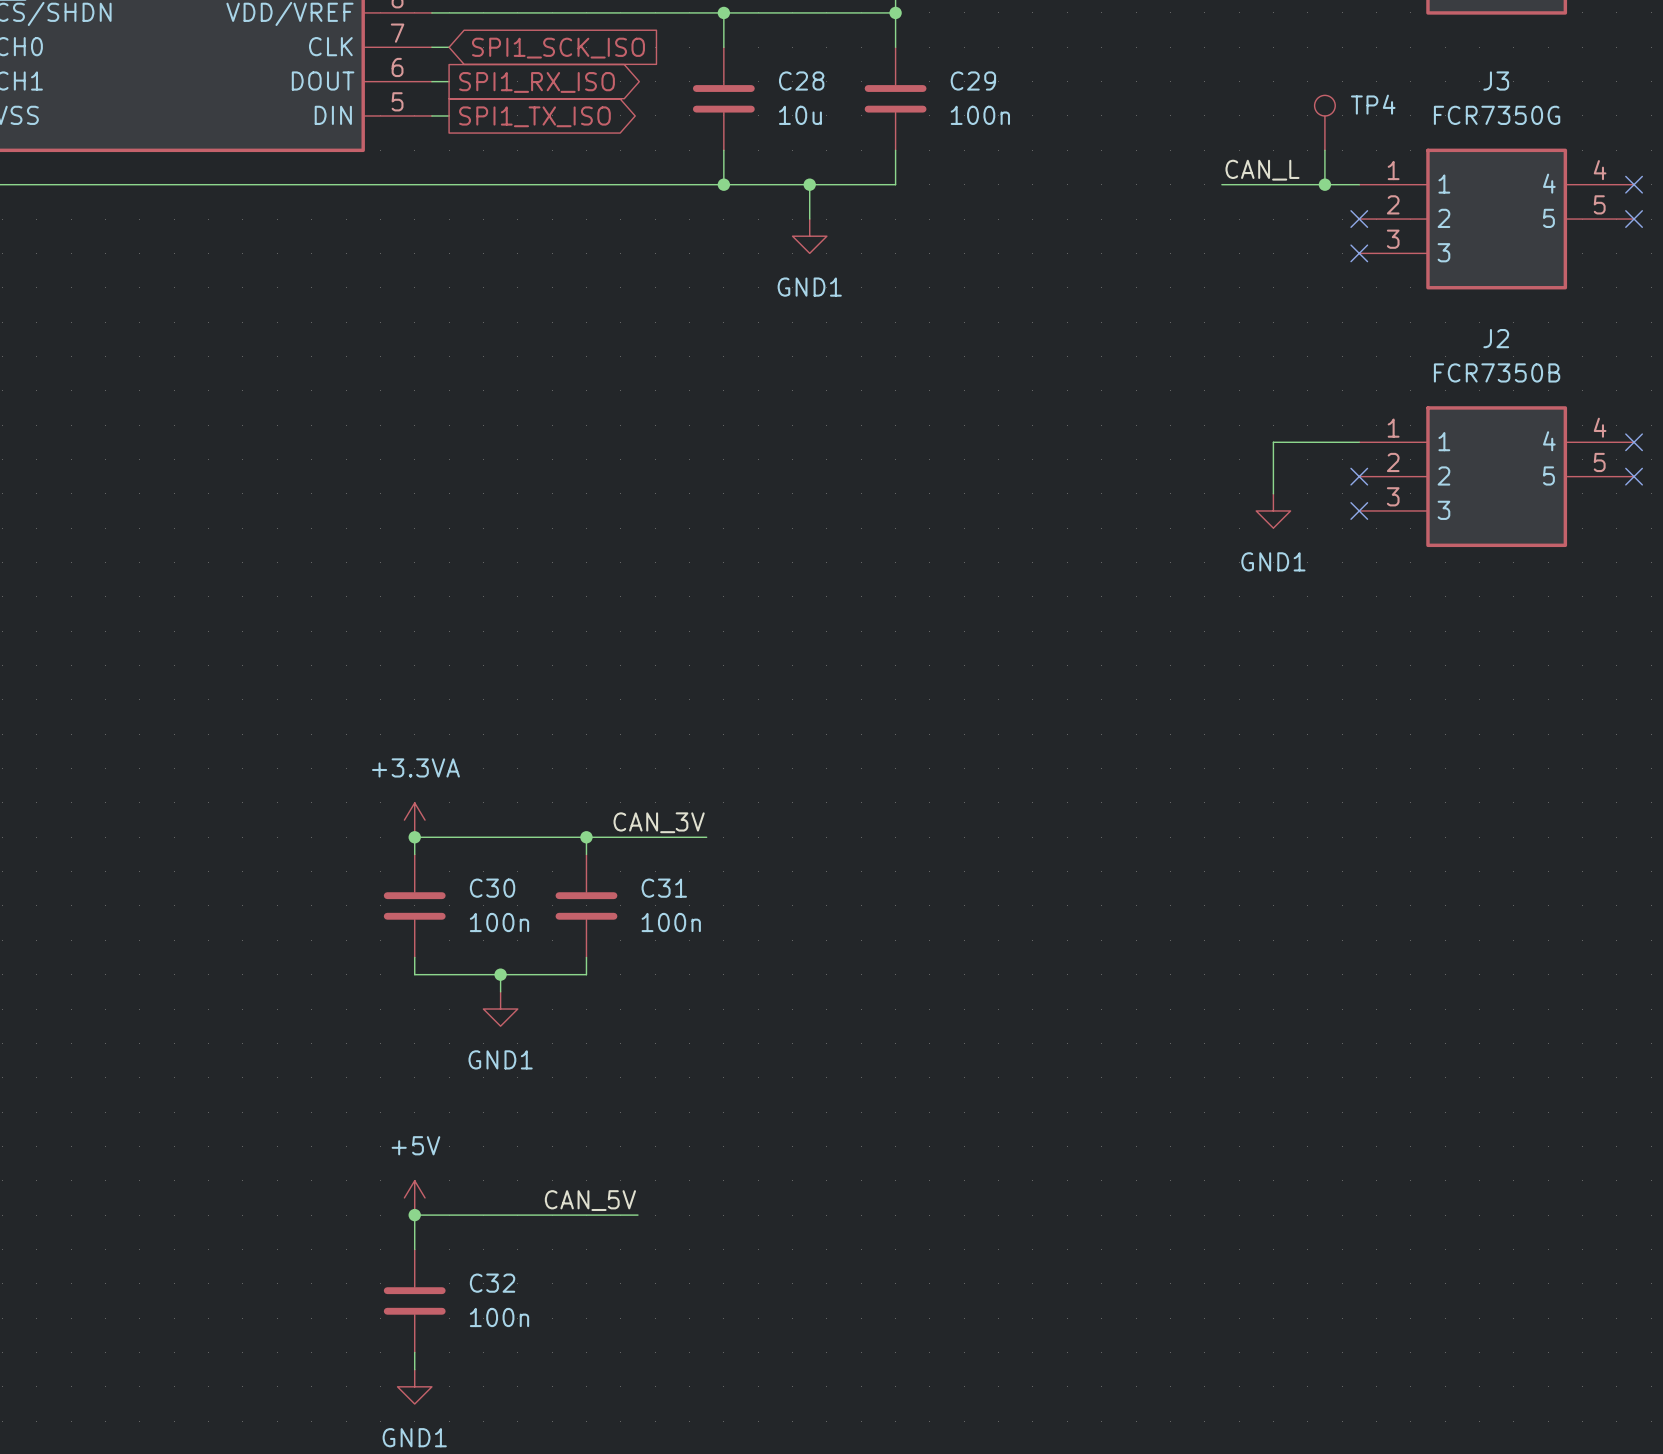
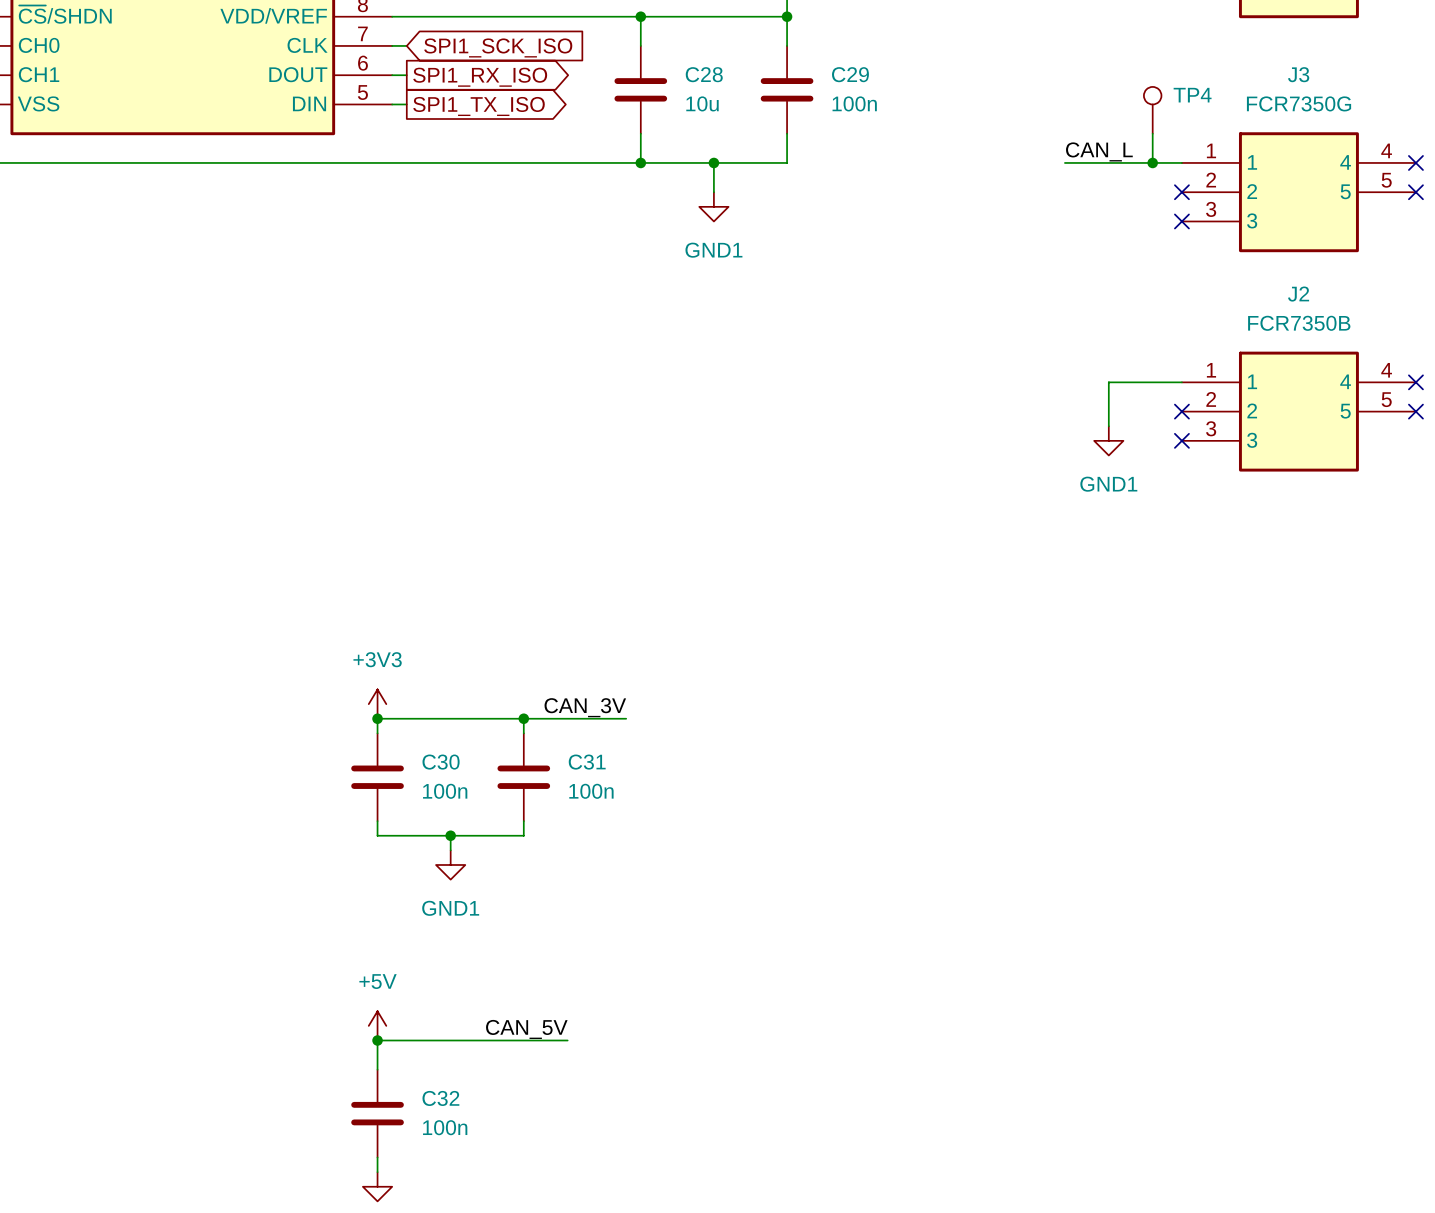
power symbol: +3.3VA (414, 820) -> +3V3 (377, 704)

